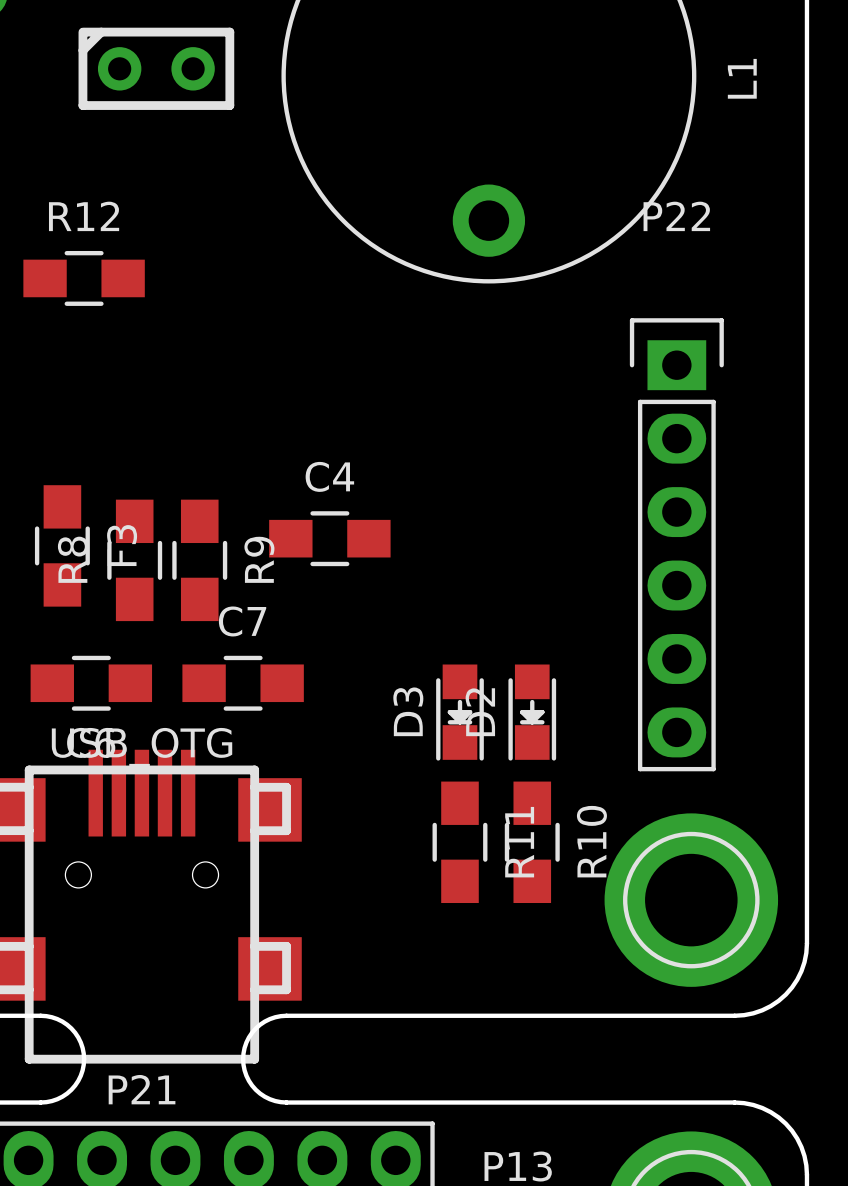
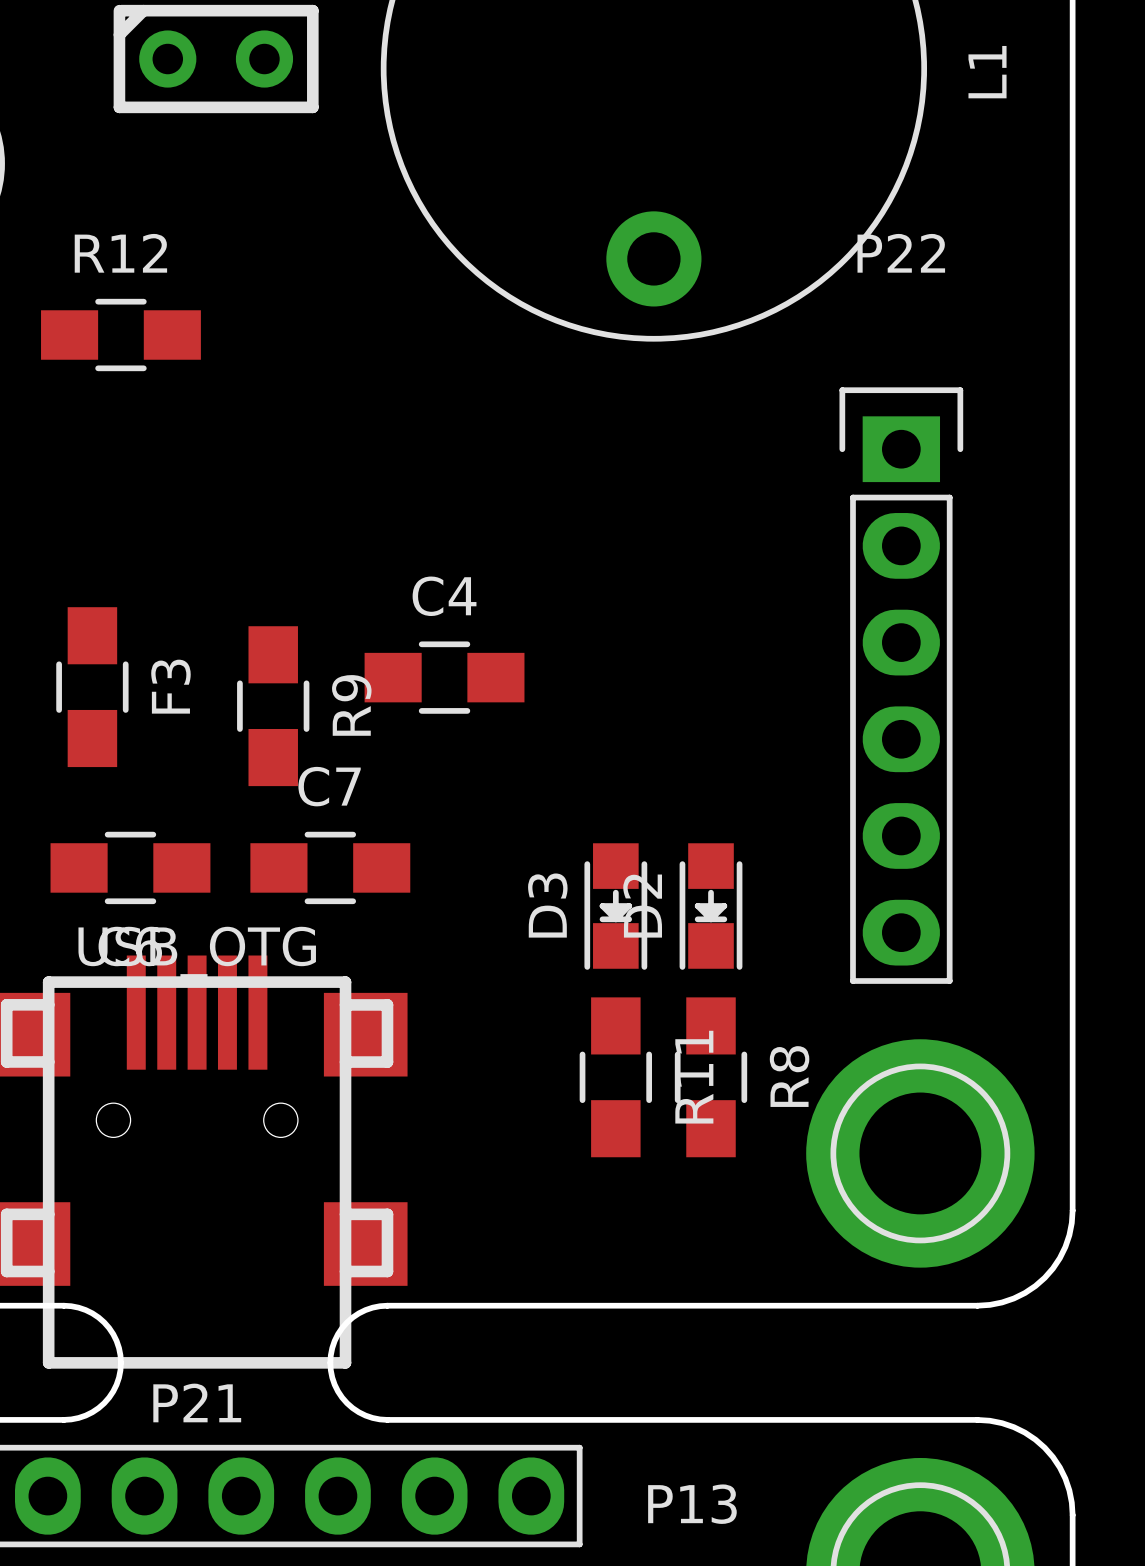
R8: (134, 560) -> none
R10 name: R10 (591, 841) -> R8 (789, 1076)

